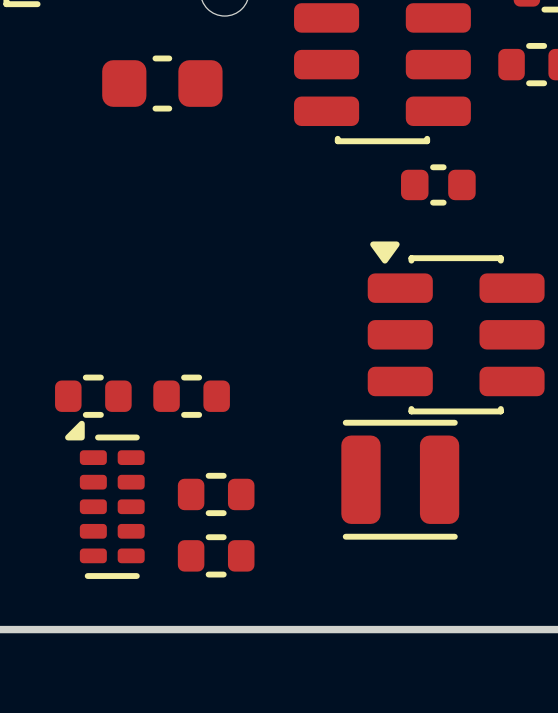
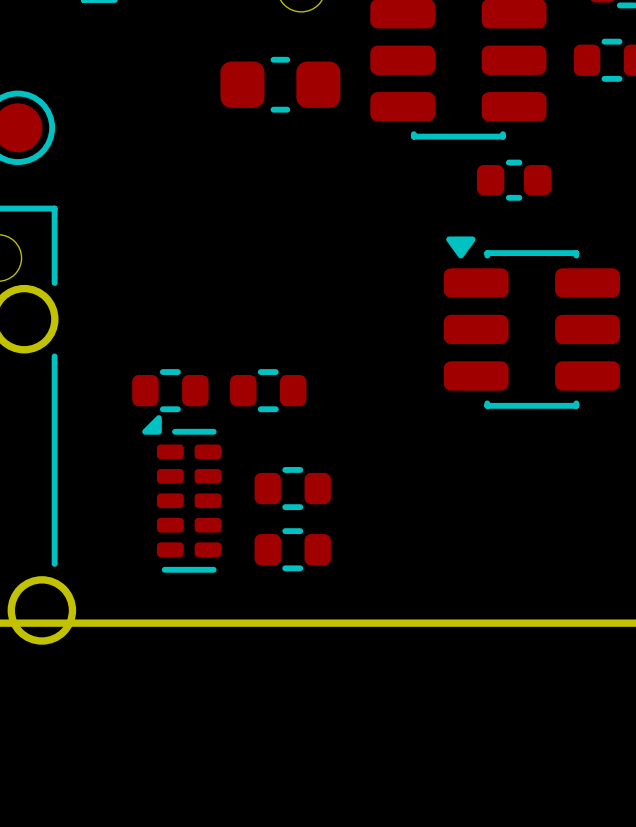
part position: (162, 83) -> (280, 84)
part: (400, 479) -> none

